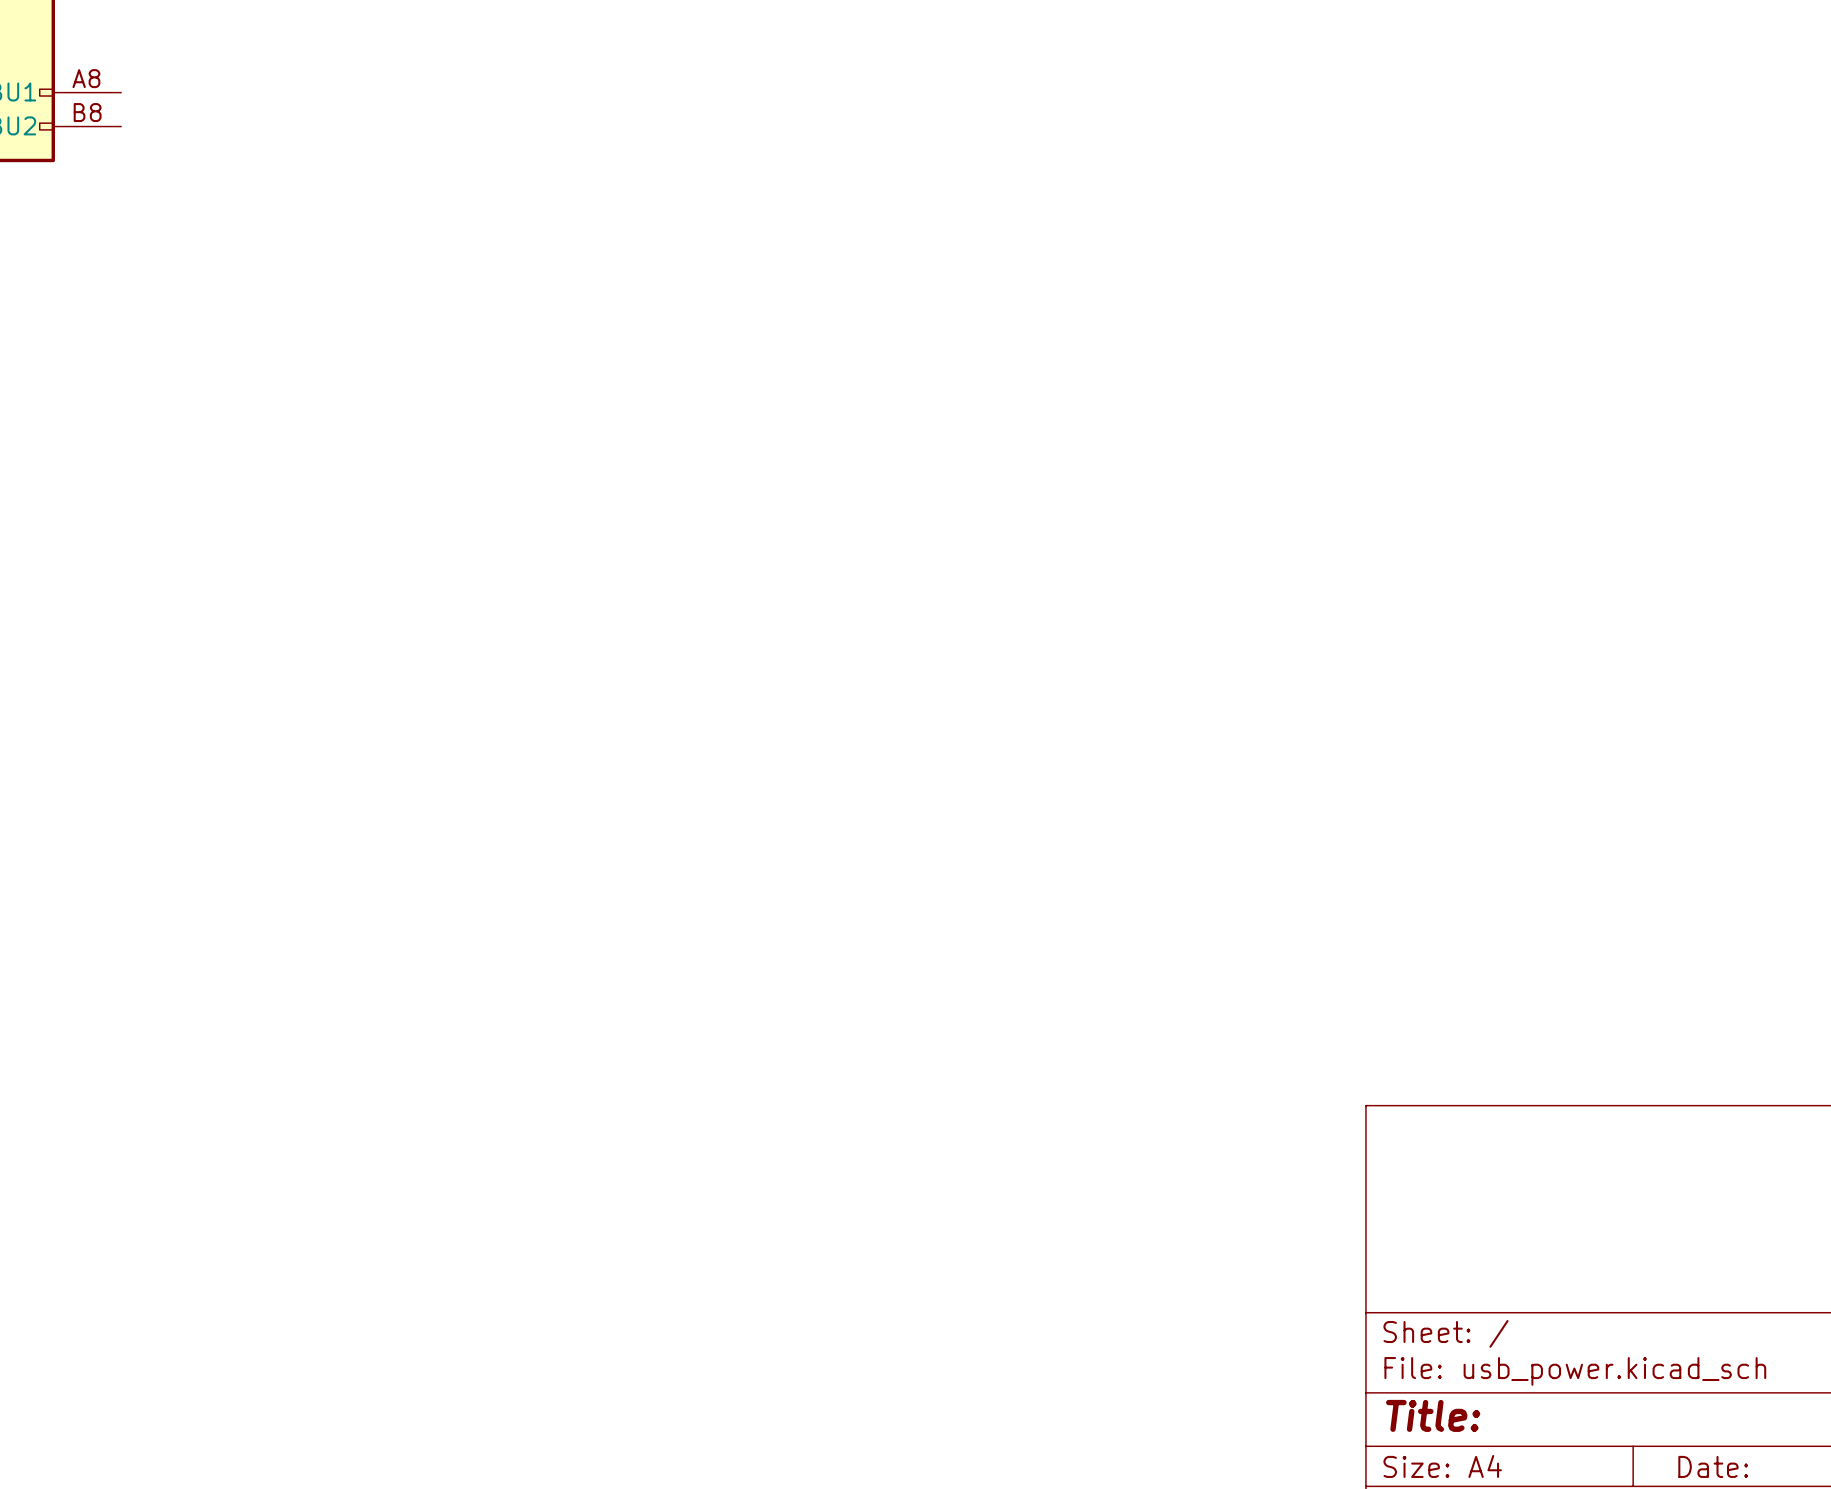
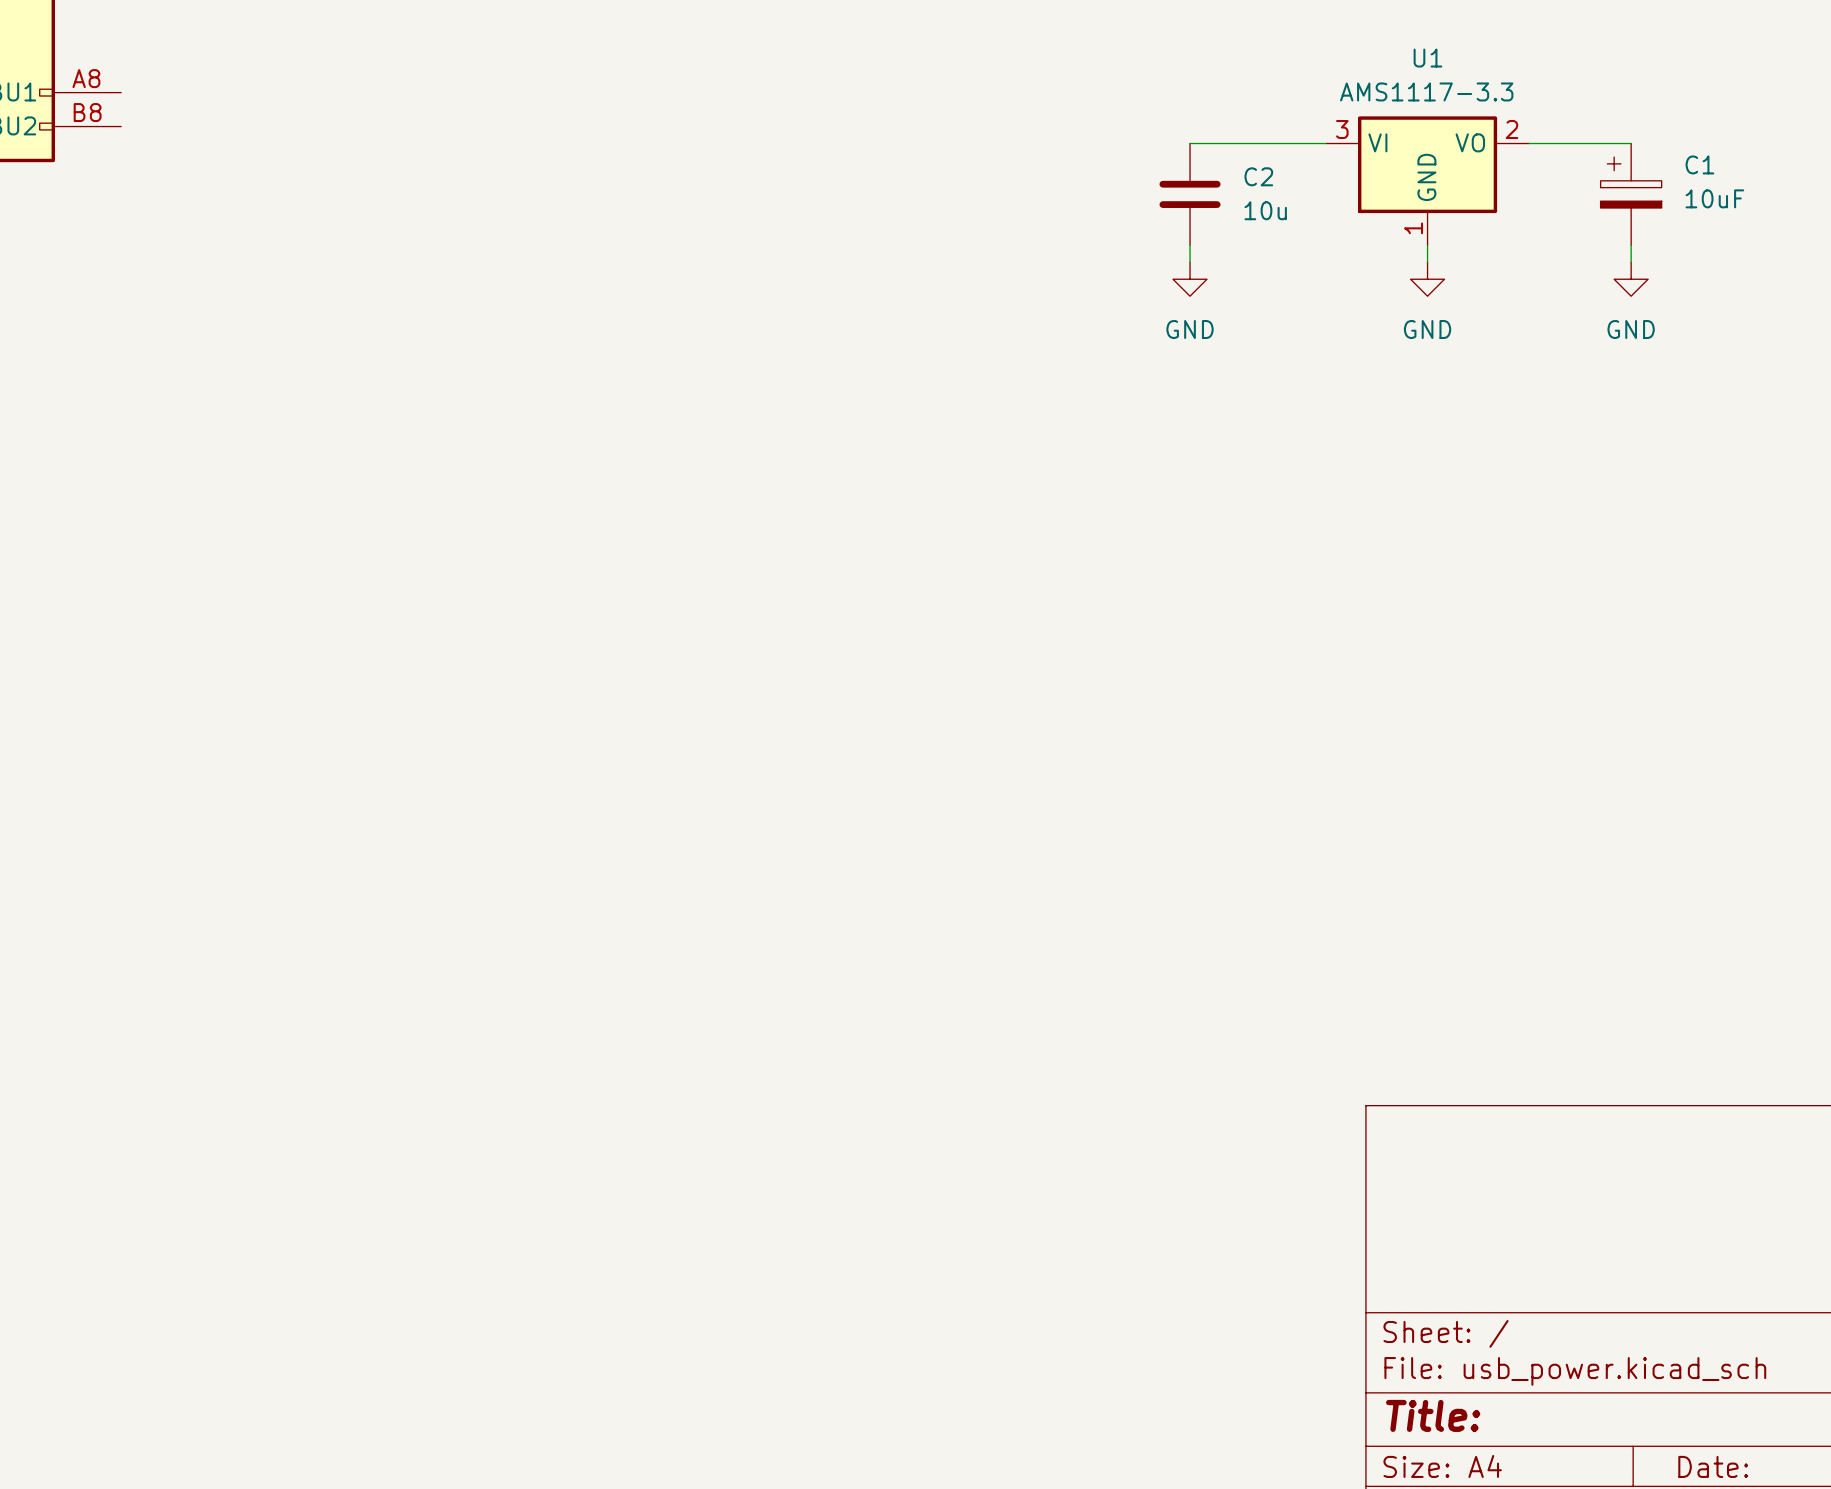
wire: none -> (1190, 143) (1325, 143)
wire: none -> (1529, 143) (1631, 143)
U1: none -> AMS1117-3.3 (1427, 180)
C2: none -> 10u (1190, 194)
C1: none -> 10uF (1631, 194)
wire: none -> (1190, 245) (1190, 262)
wire: none -> (1427, 245) (1427, 262)
wire: none -> (1631, 245) (1631, 262)
power symbol: none -> GND (1190, 279)
power symbol: none -> GND (1427, 279)
power symbol: none -> GND (1631, 279)

